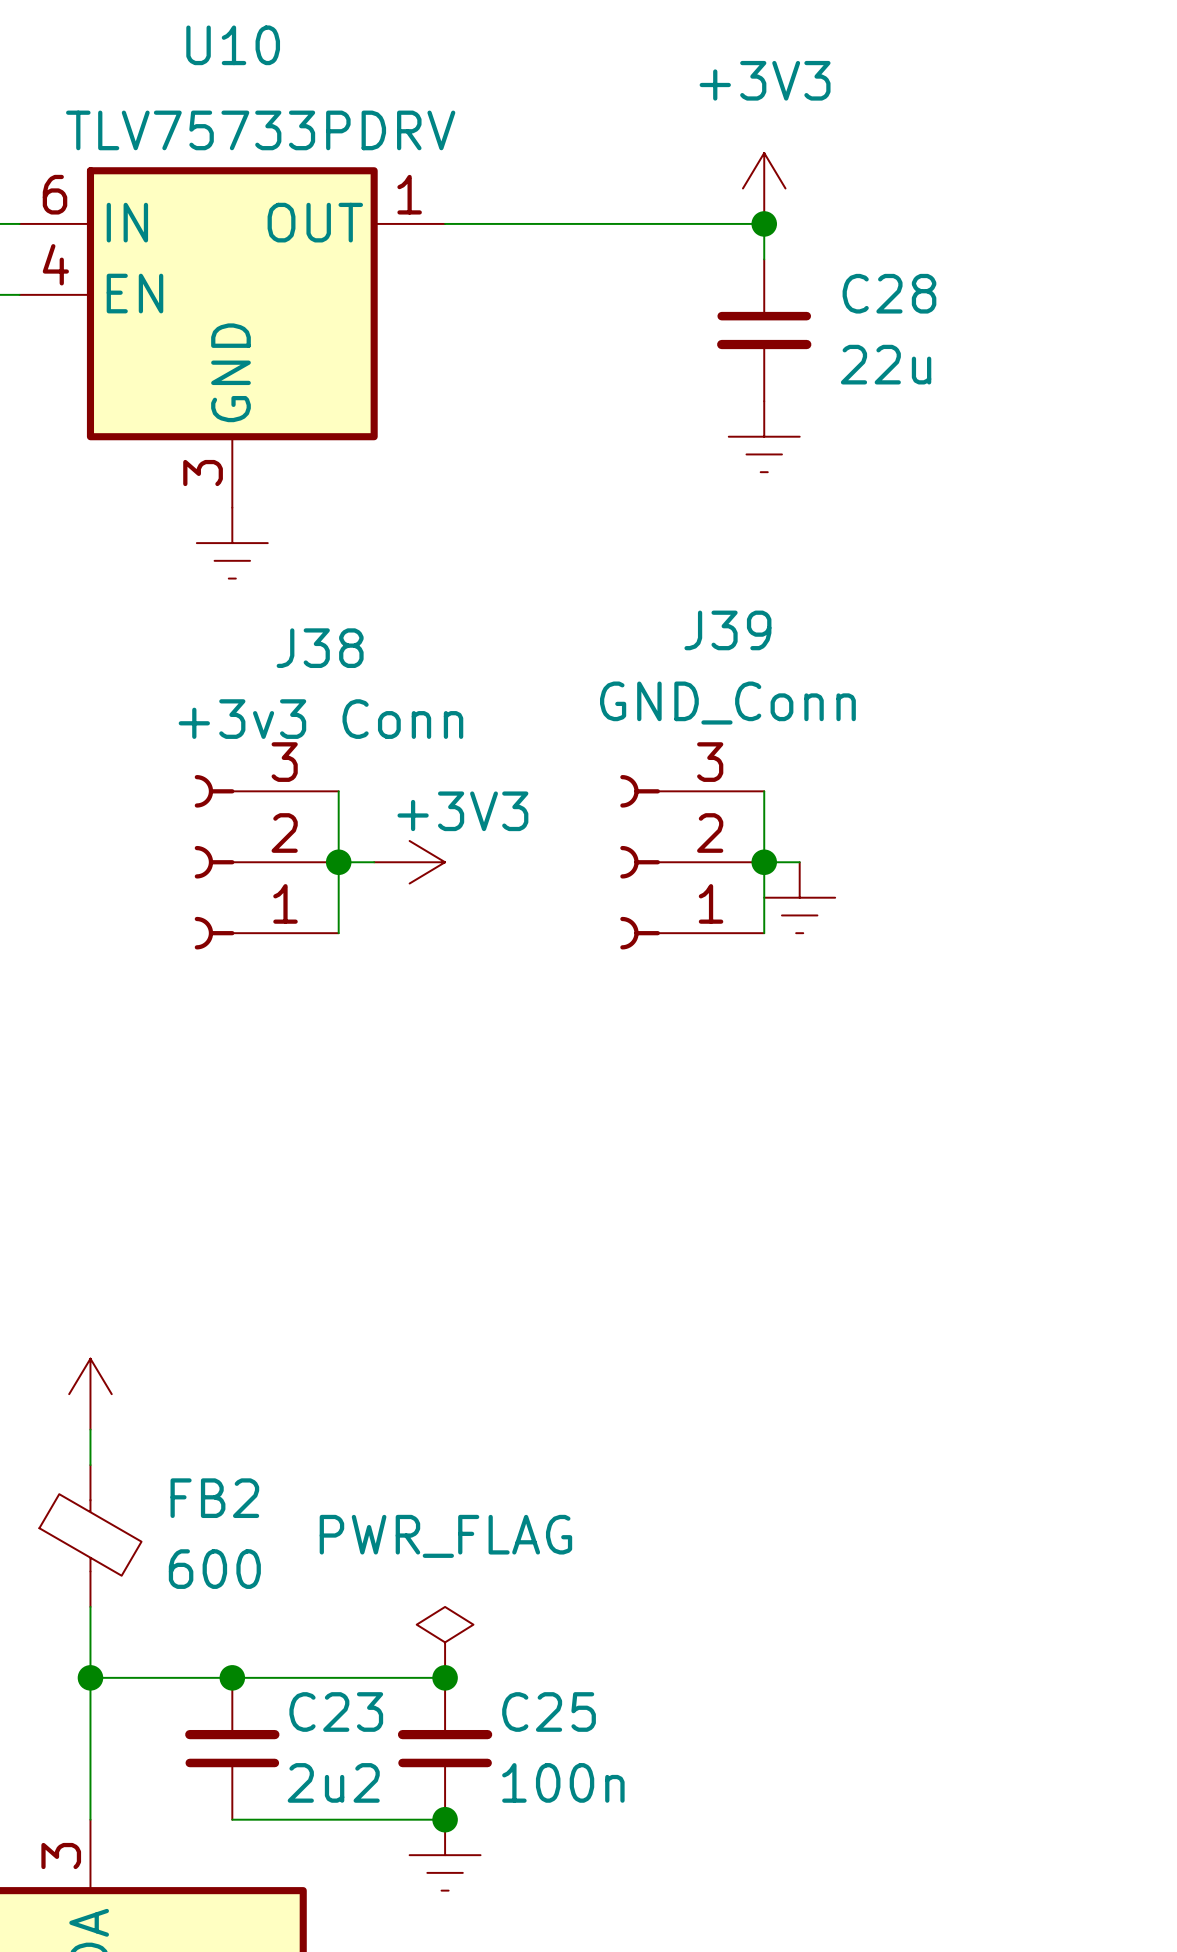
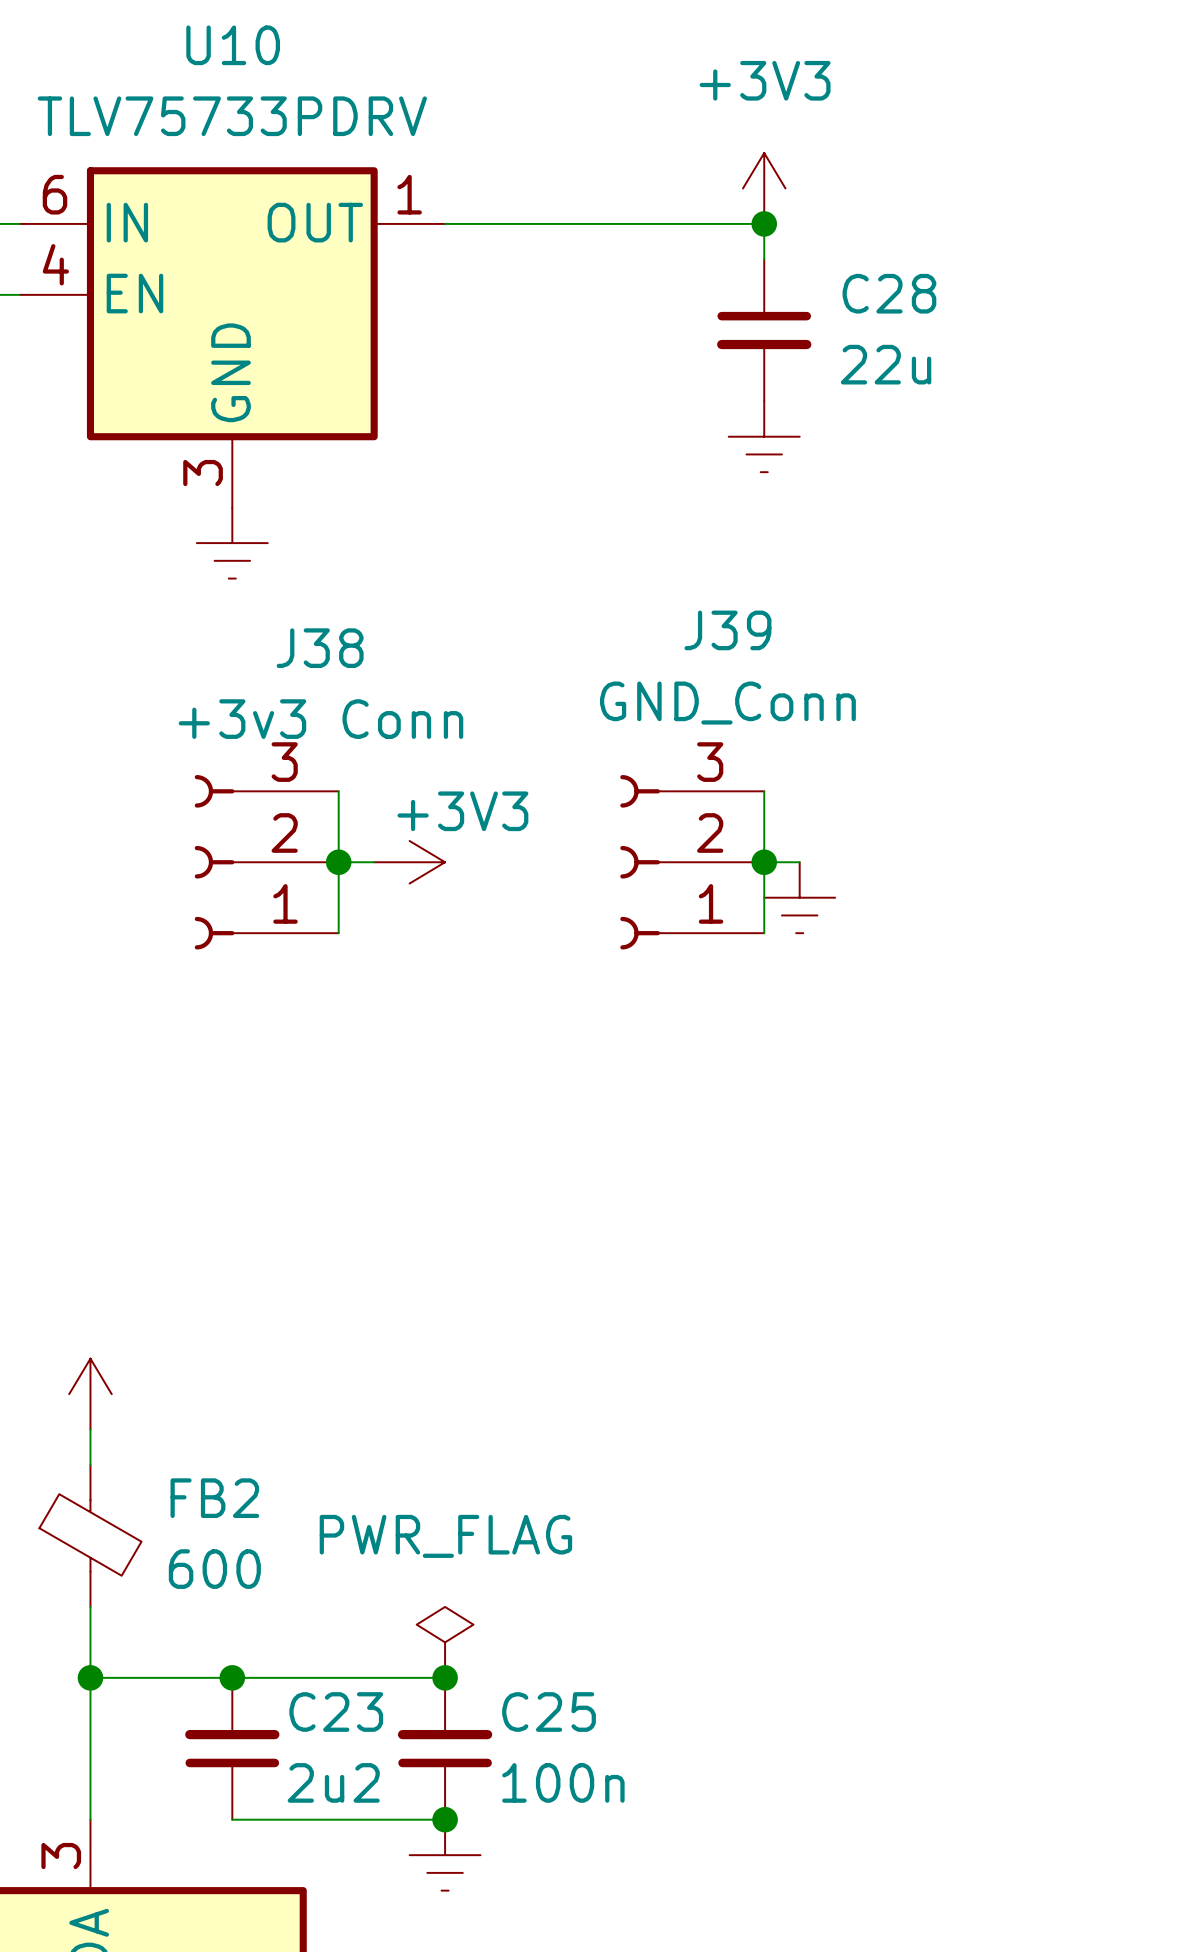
U10 value position: TLV75733PDRV (260, 130) -> TLV75733PDRV (232, 116)

